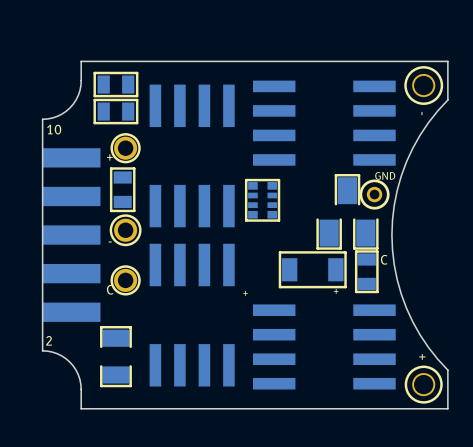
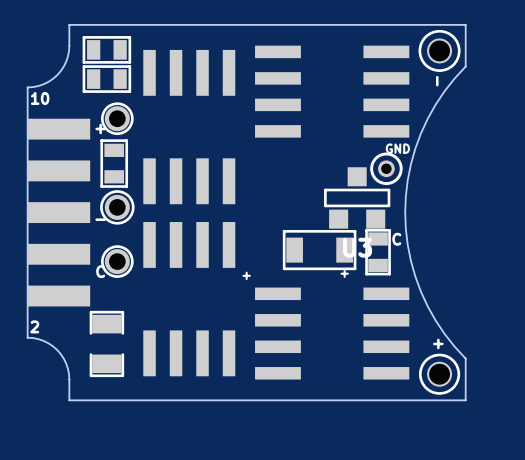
part: (262, 200) -> none
part: (347, 211) -> none
part: none -> (357, 197)

